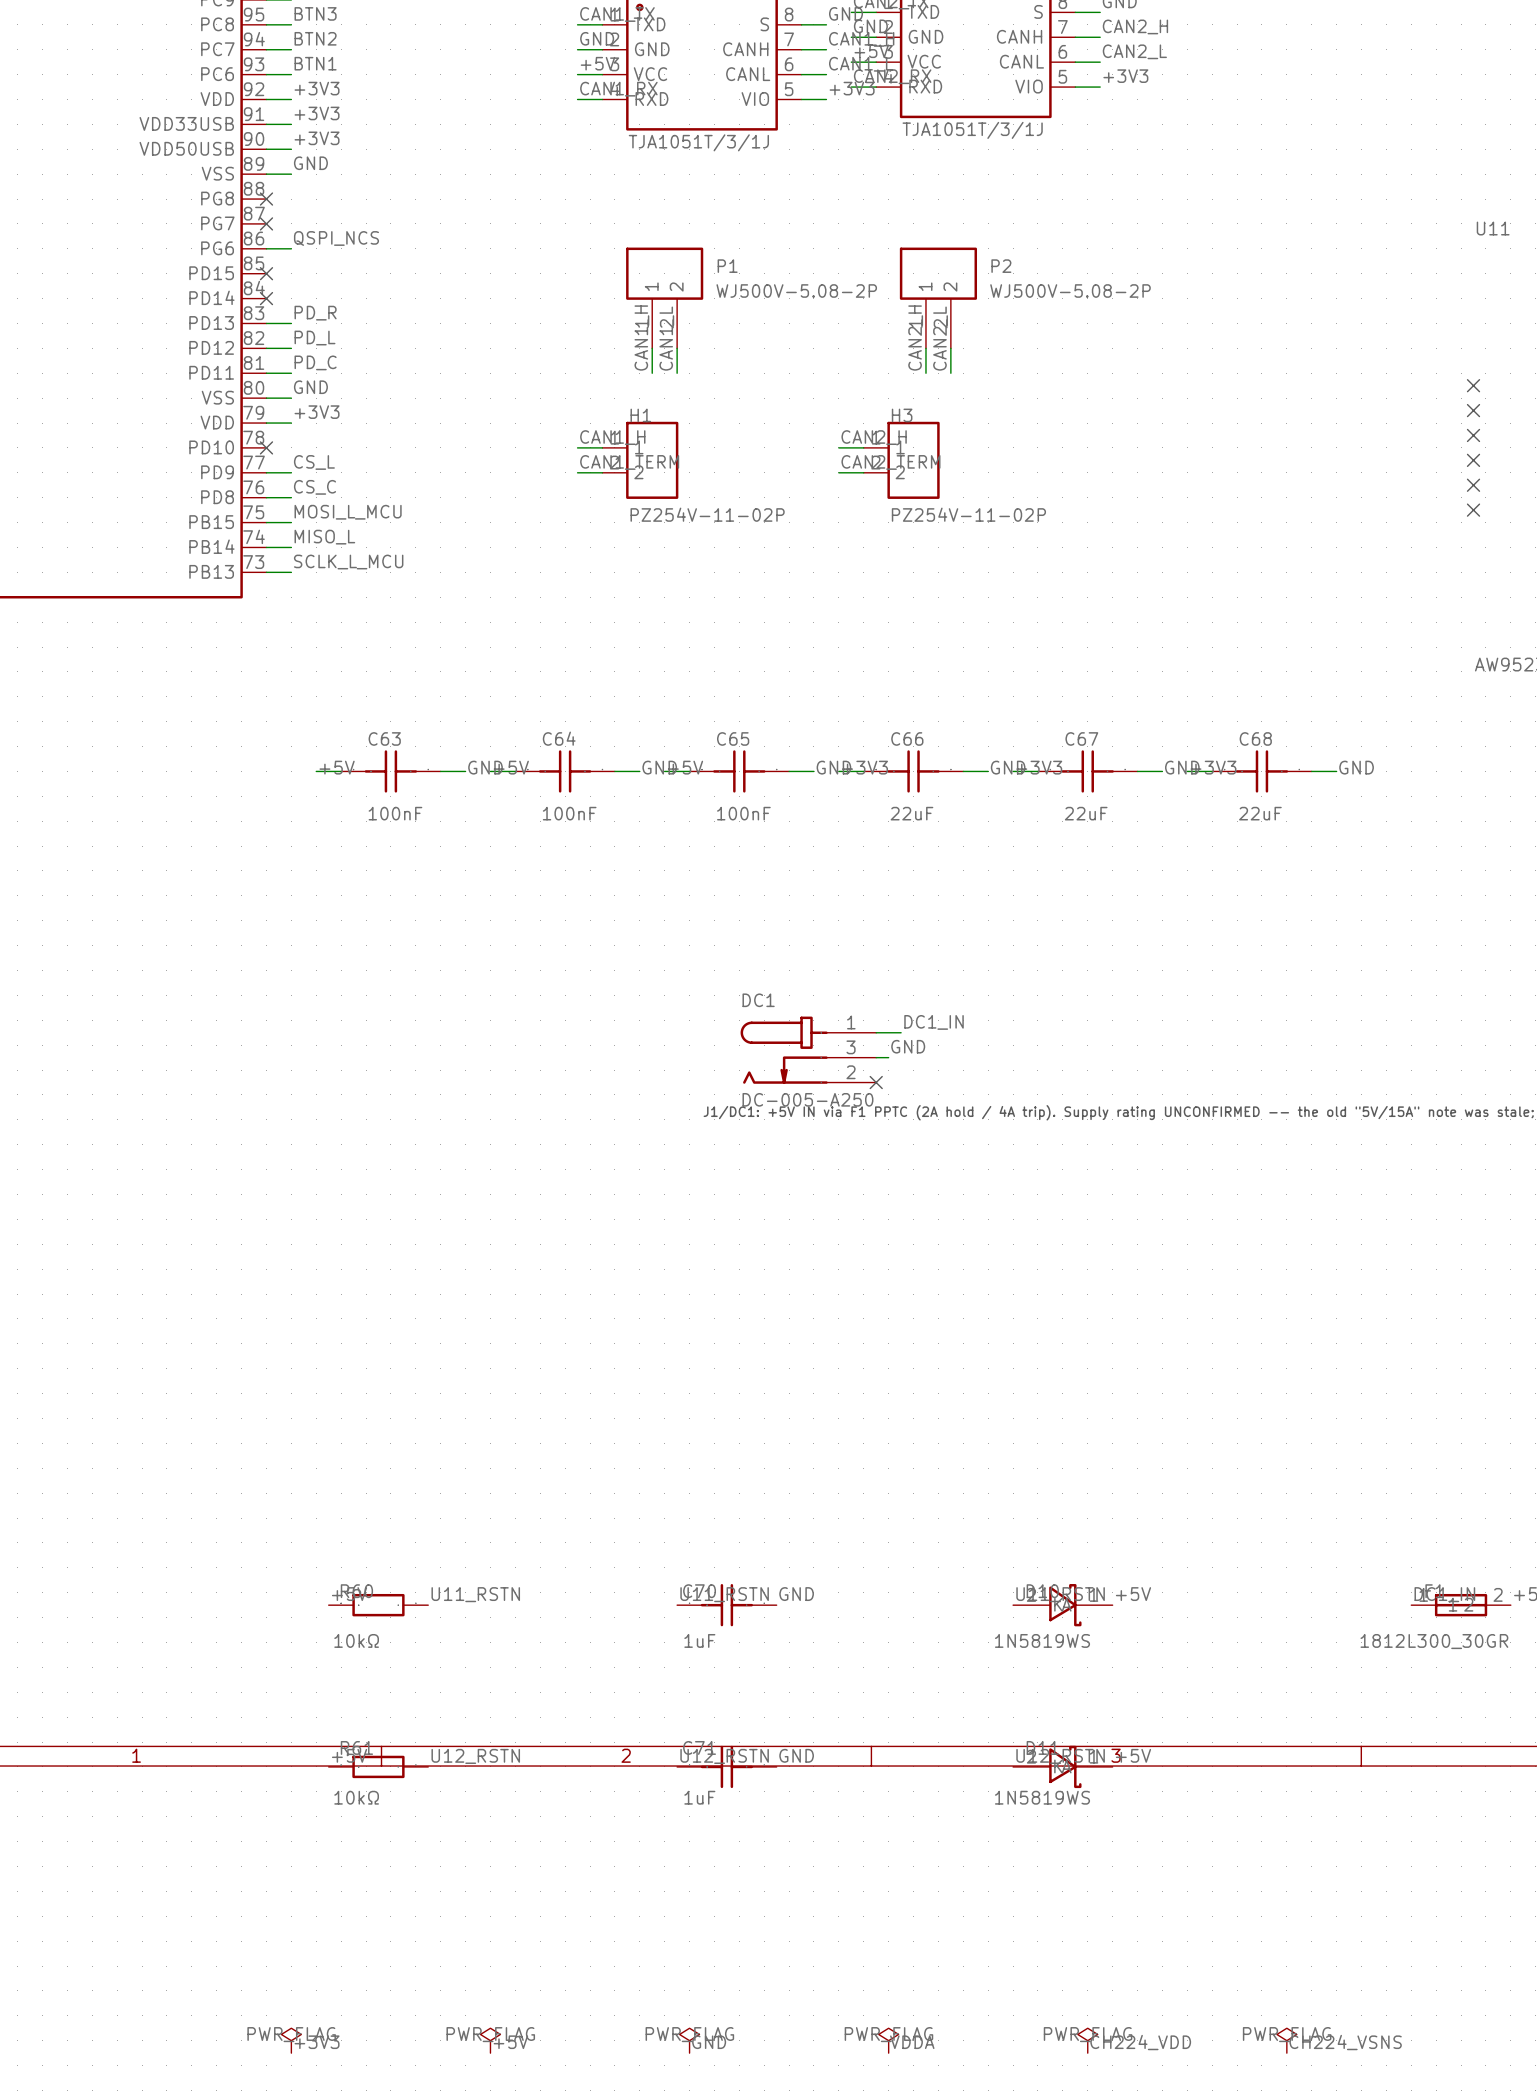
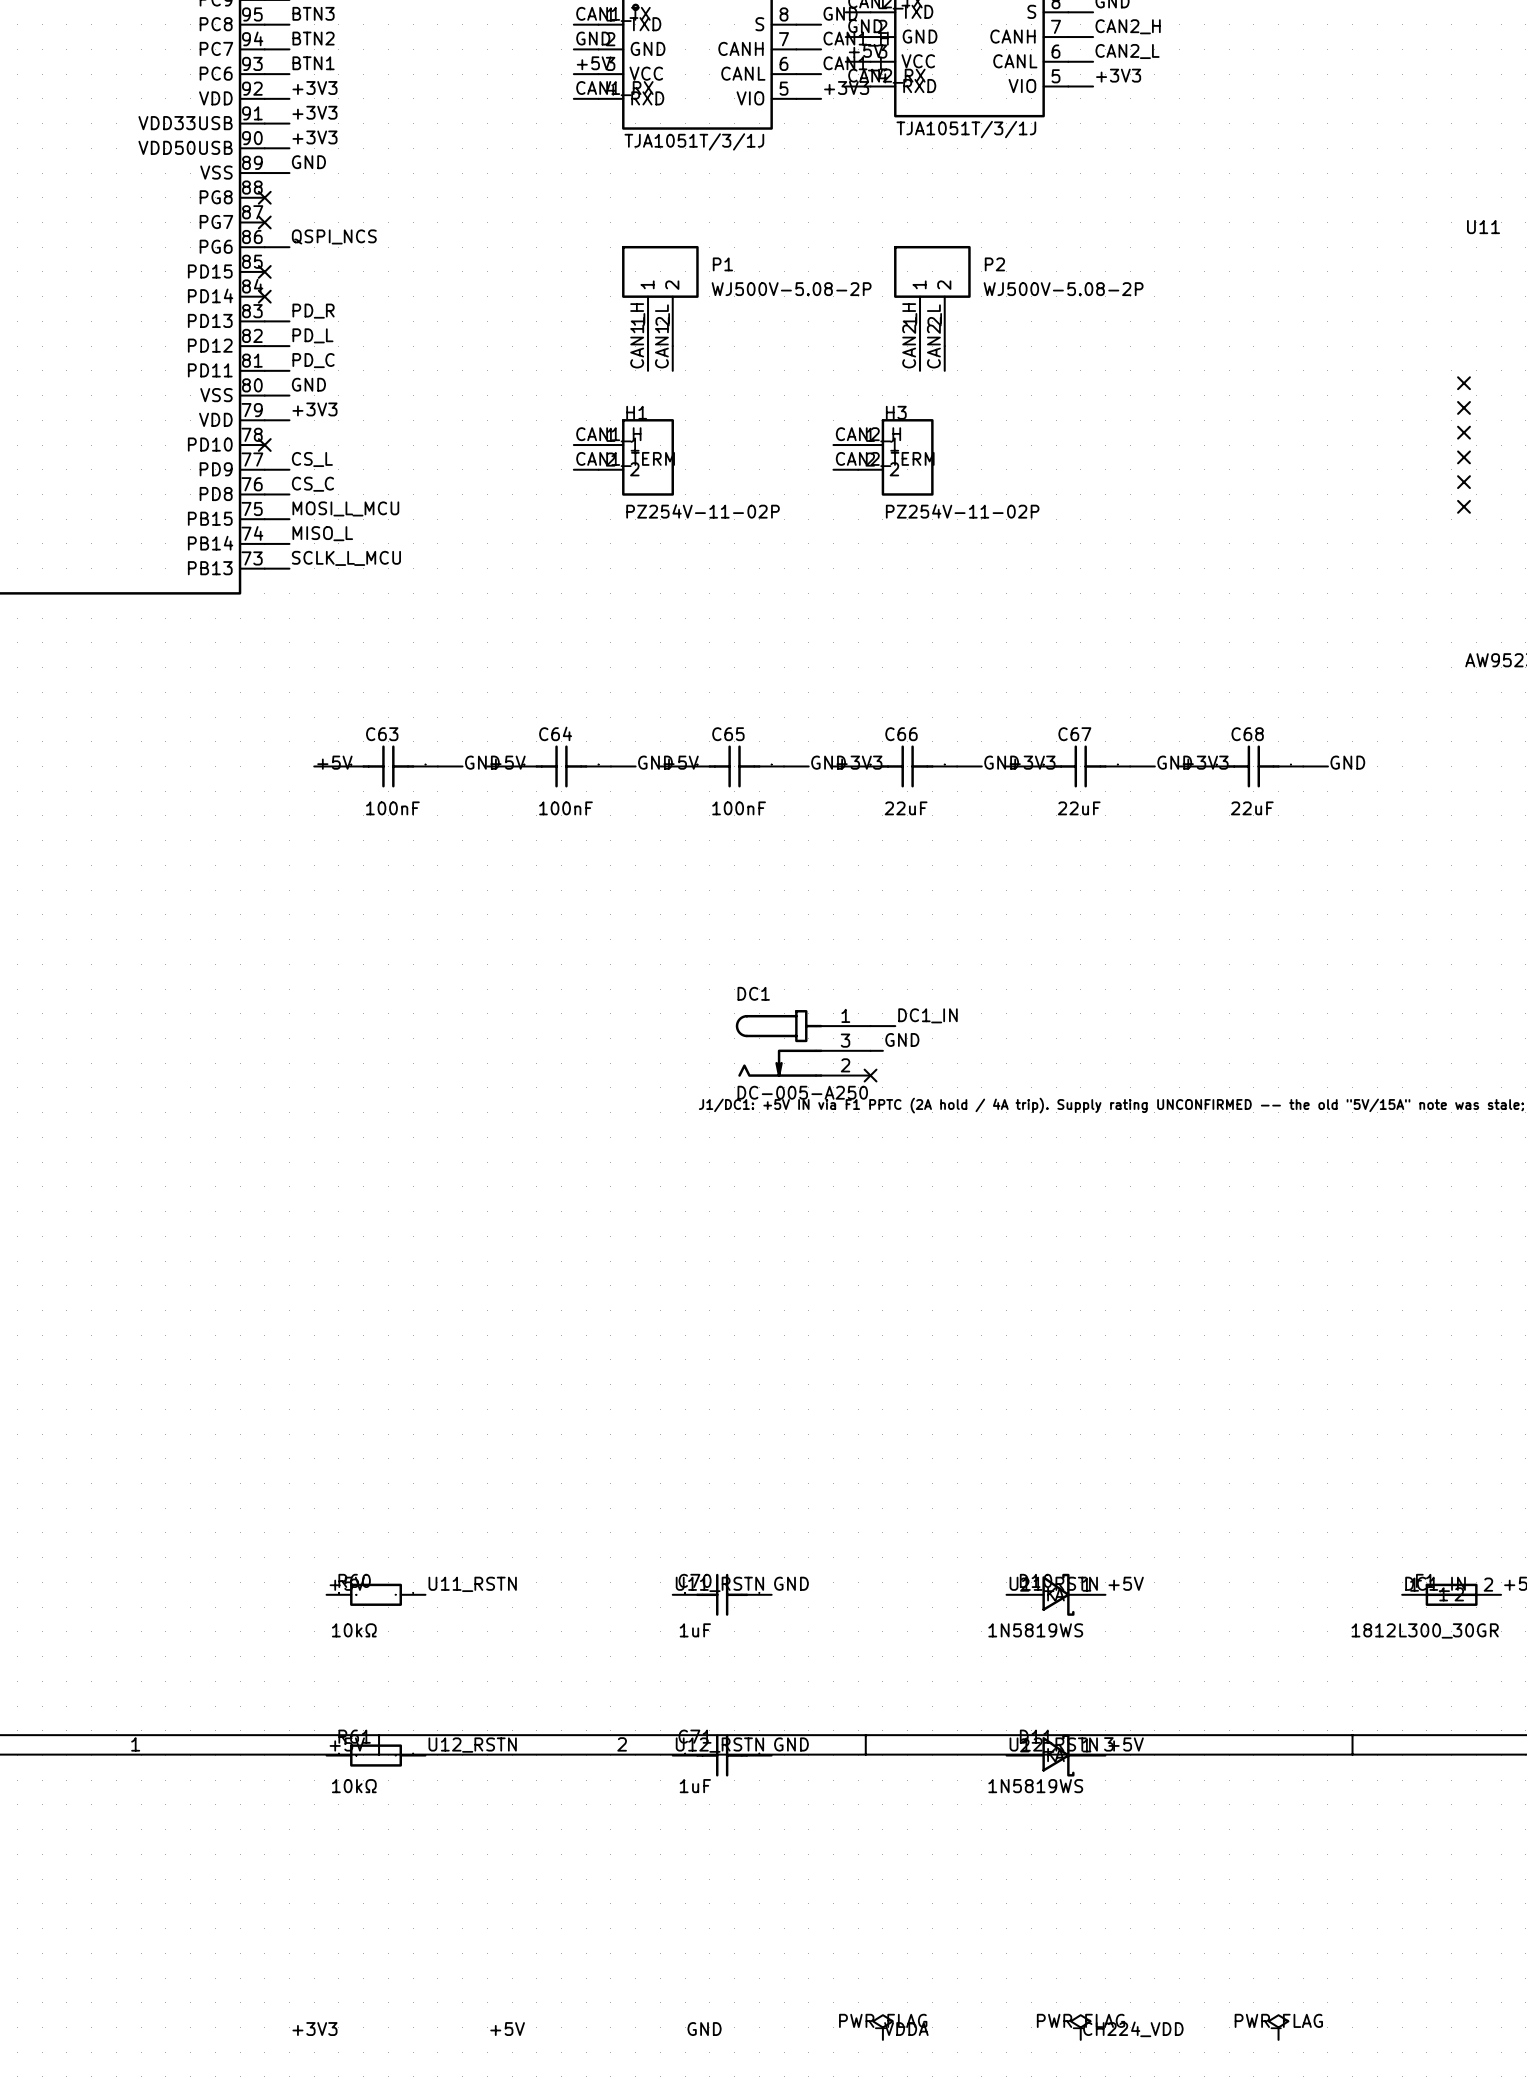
power symbol: PWR_FLAG (291, 2040) -> none
power symbol: PWR_FLAG (490, 2040) -> none
power symbol: PWR_FLAG (689, 2040) -> none
label: CH224_VSNS (1345, 2042) -> none

